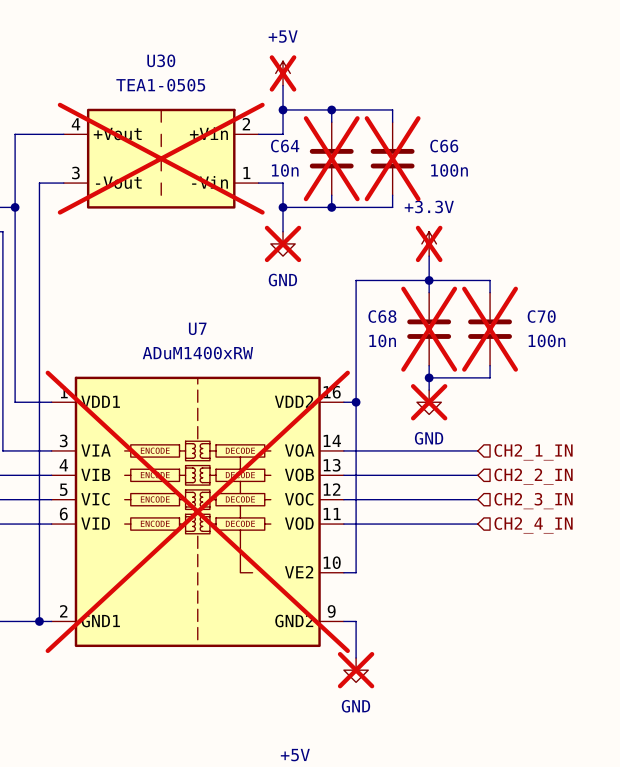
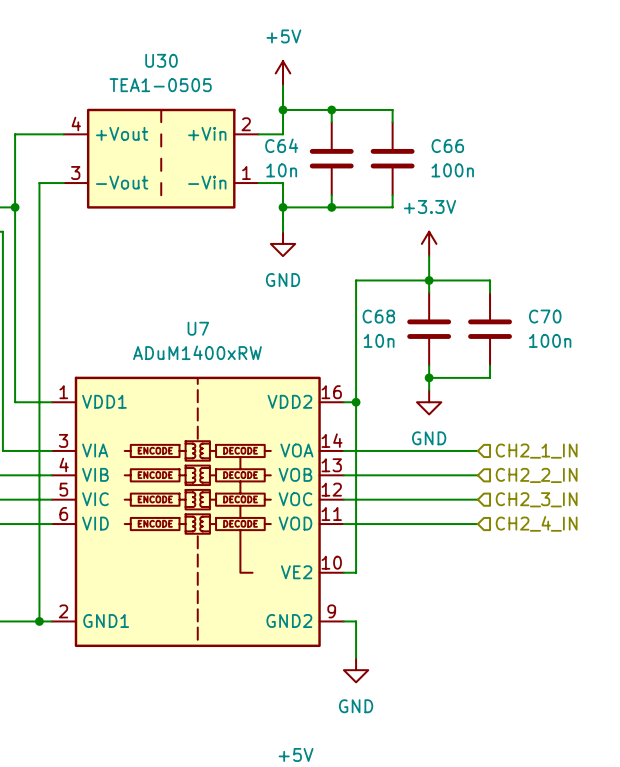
power symbol do-not-place cross: (283, 73) -> none
U30 do-not-place cross: (161, 158) -> none
C64 do-not-place cross: (331, 158) -> none
C66 do-not-place cross: (392, 158) -> none
power symbol do-not-place cross: (283, 243) -> none
power symbol do-not-place cross: (429, 243) -> none
C68 do-not-place cross: (429, 329) -> none
C70 do-not-place cross: (490, 329) -> none
power symbol do-not-place cross: (429, 402) -> none
U7 do-not-place cross: (197, 511) -> none
power symbol do-not-place cross: (356, 670) -> none

